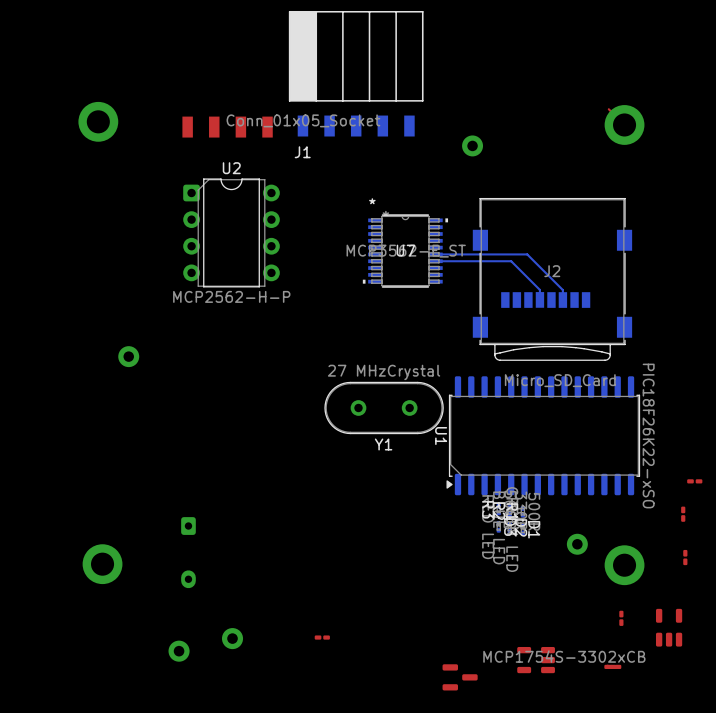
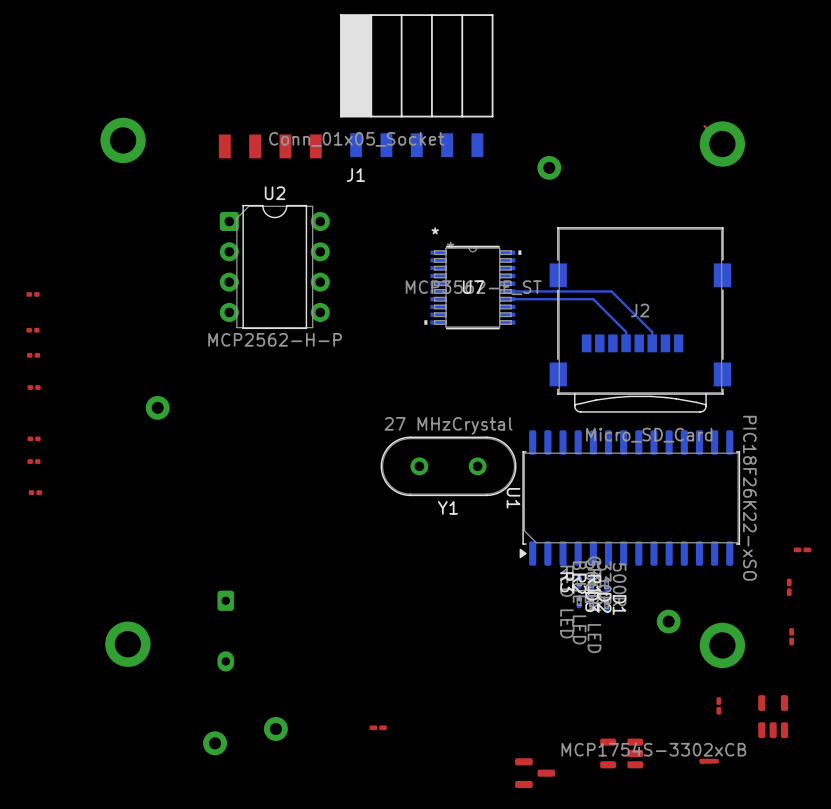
part: none -> (33, 294)
part: none -> (33, 330)
part: none -> (33, 355)
part: none -> (34, 387)
part: none -> (34, 438)
part: none -> (33, 461)
part: none -> (35, 492)

